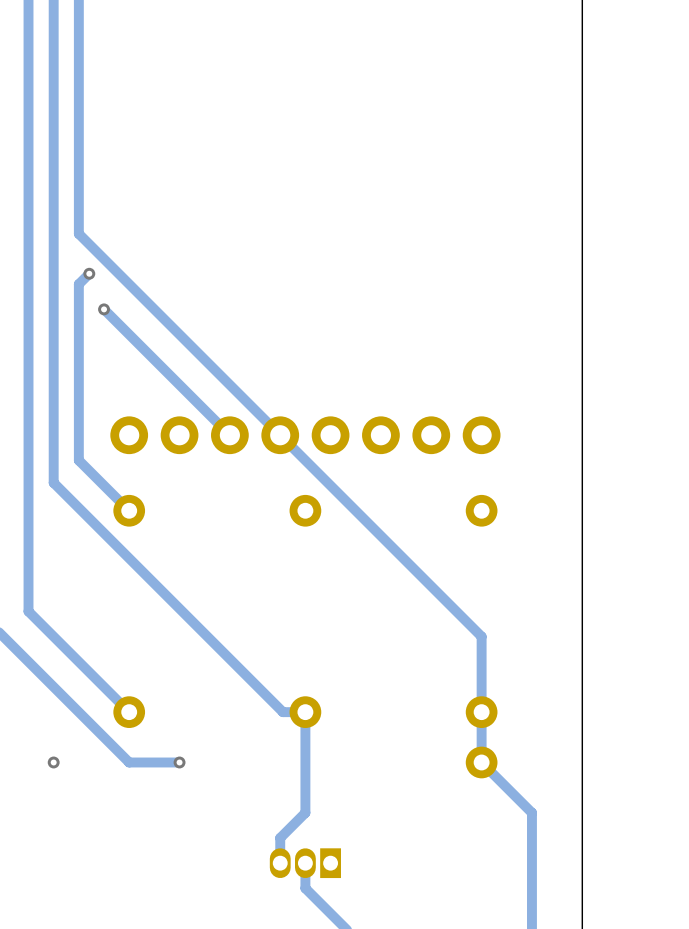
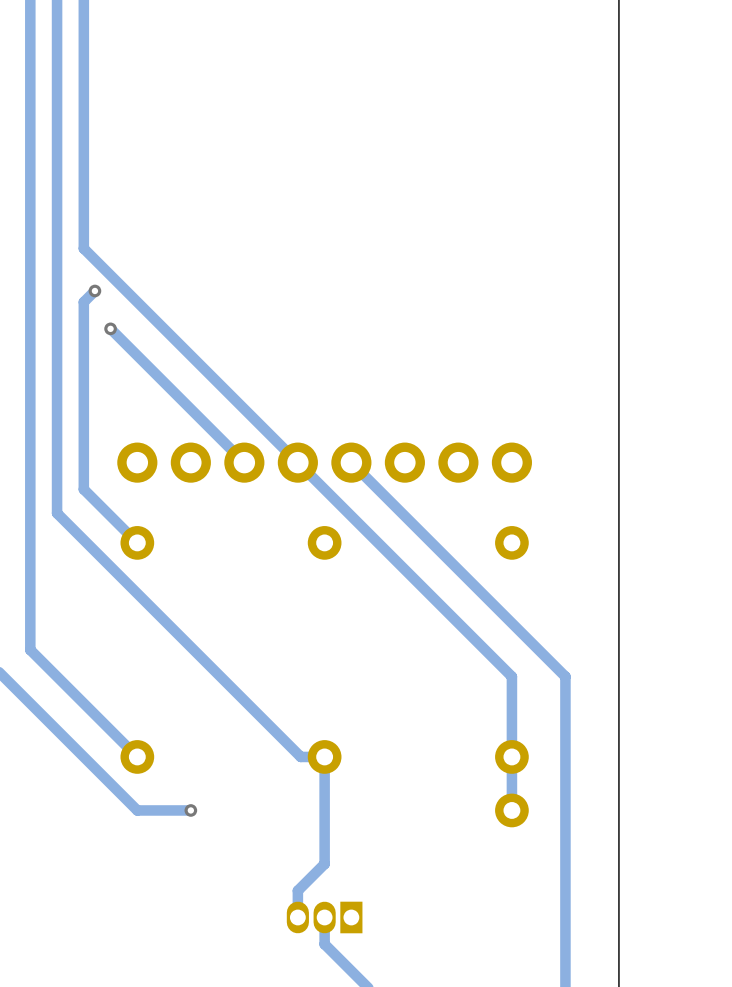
via: (53, 762) -> none
track: (481, 762) (531, 812) -> (351, 462) (565, 676) (565, 863)

